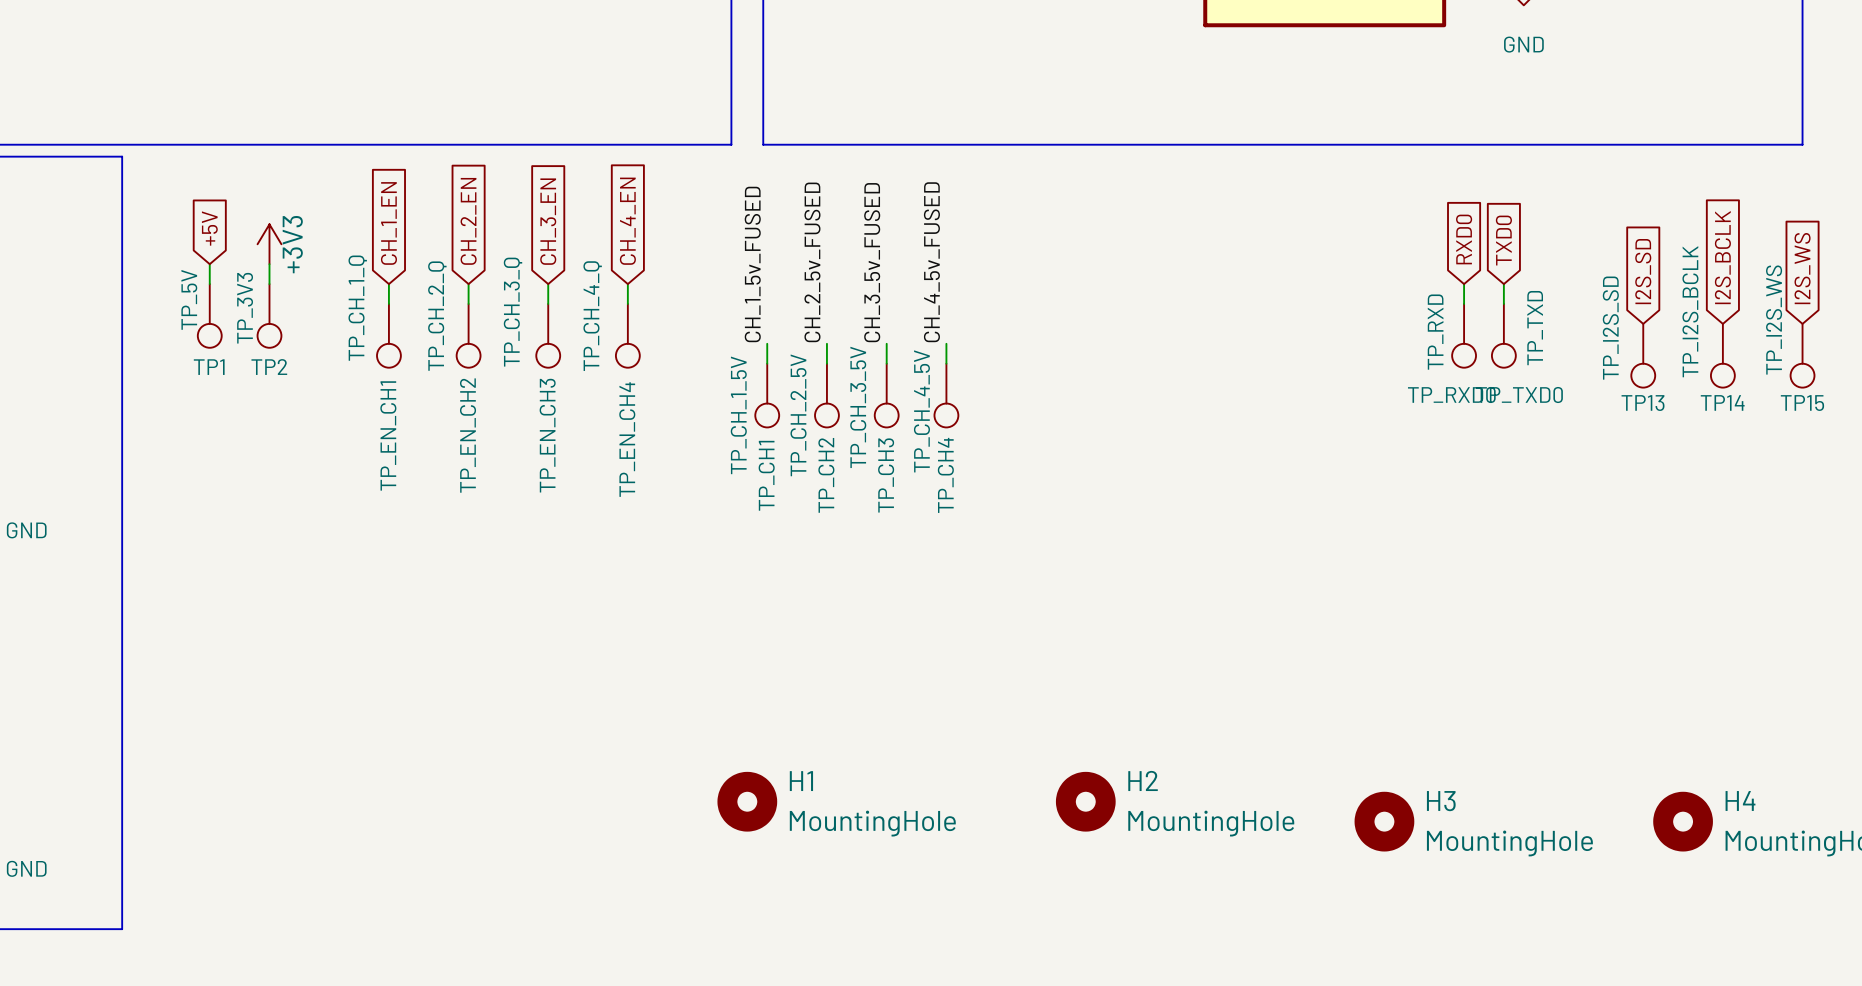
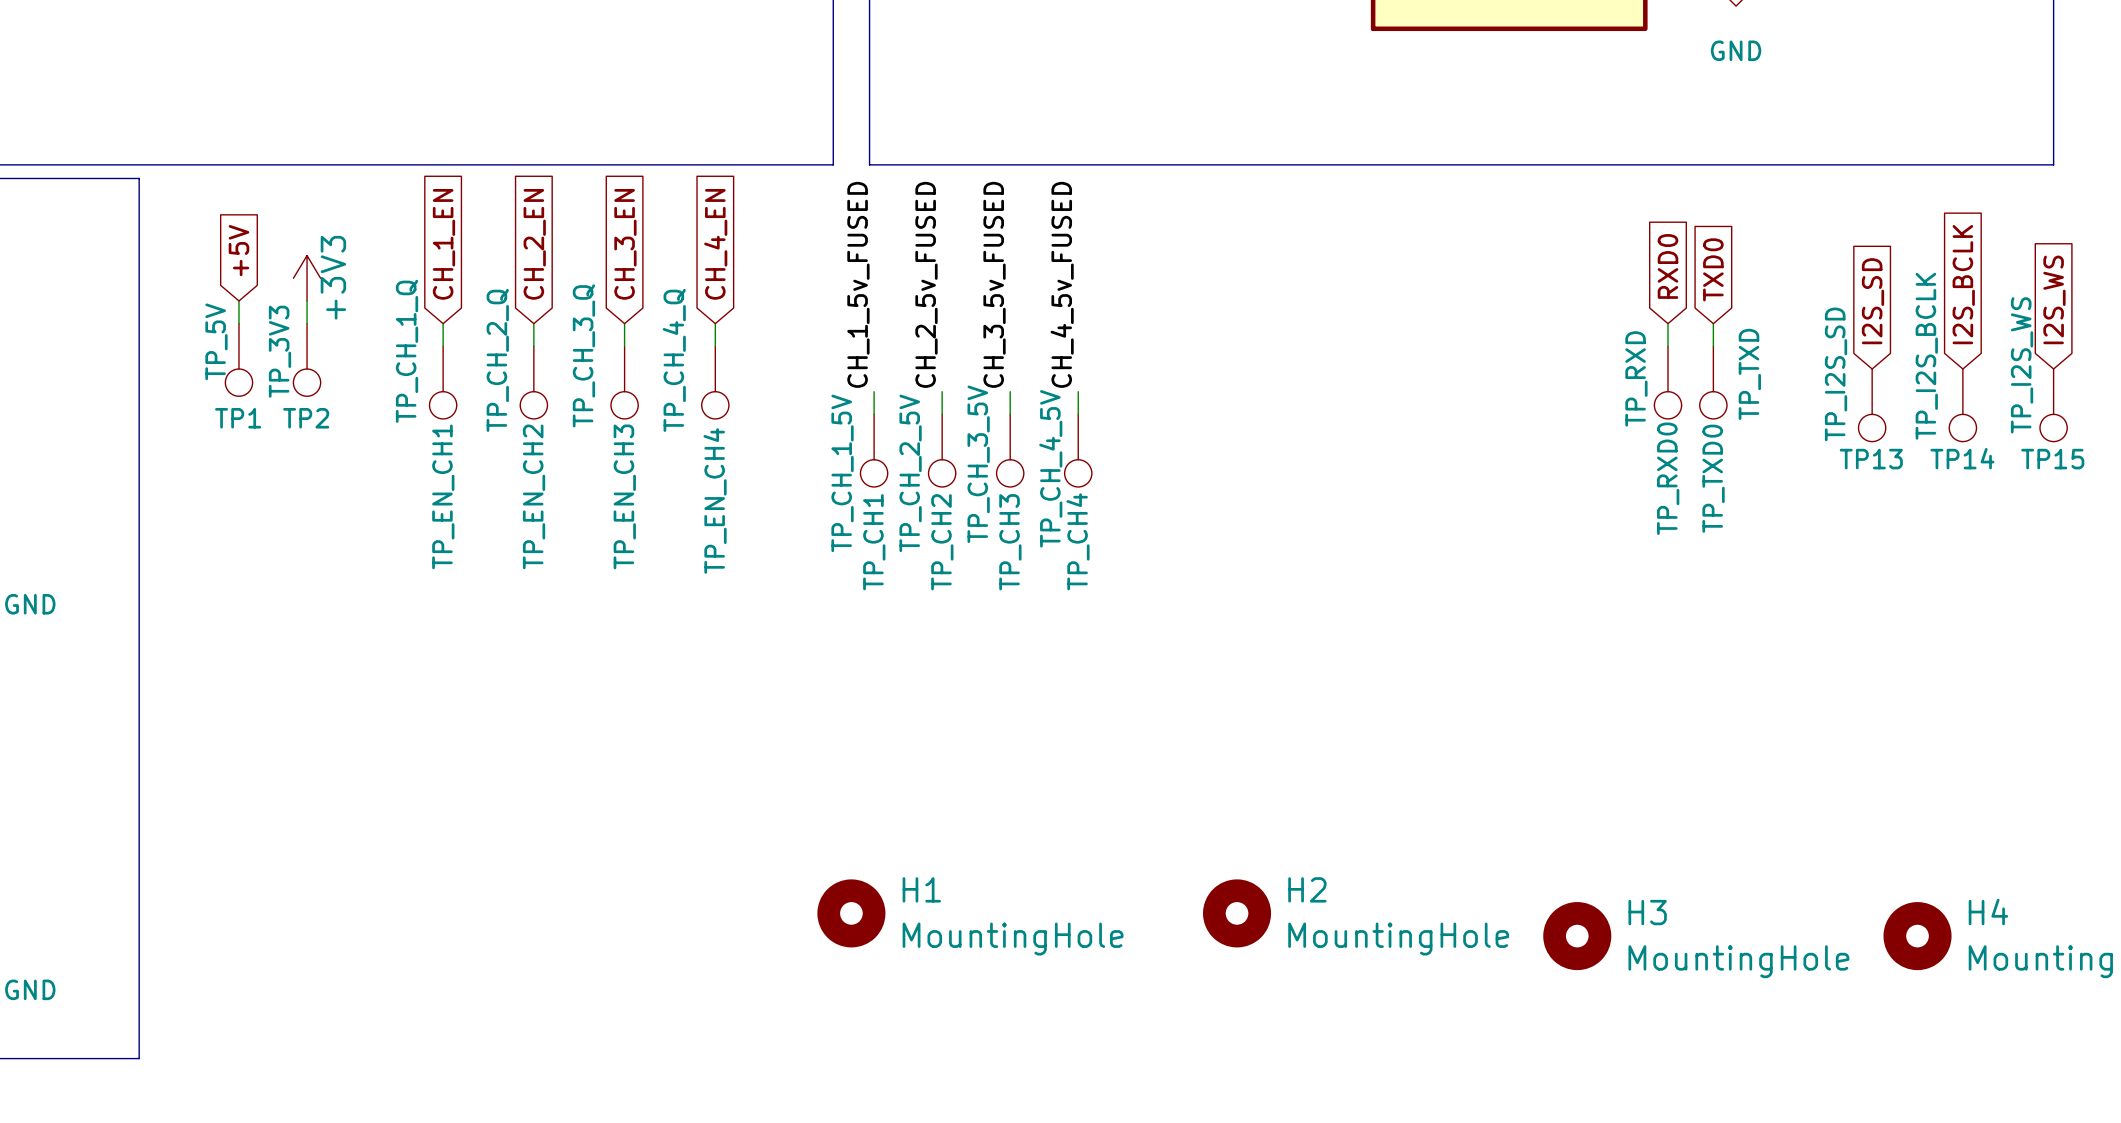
TP_RXD0 name rotation: 0° (1451, 395) -> 90° counterclockwise (1668, 478)
TP_TXD0 name rotation: 0° (1519, 395) -> 90° counterclockwise (1713, 478)

